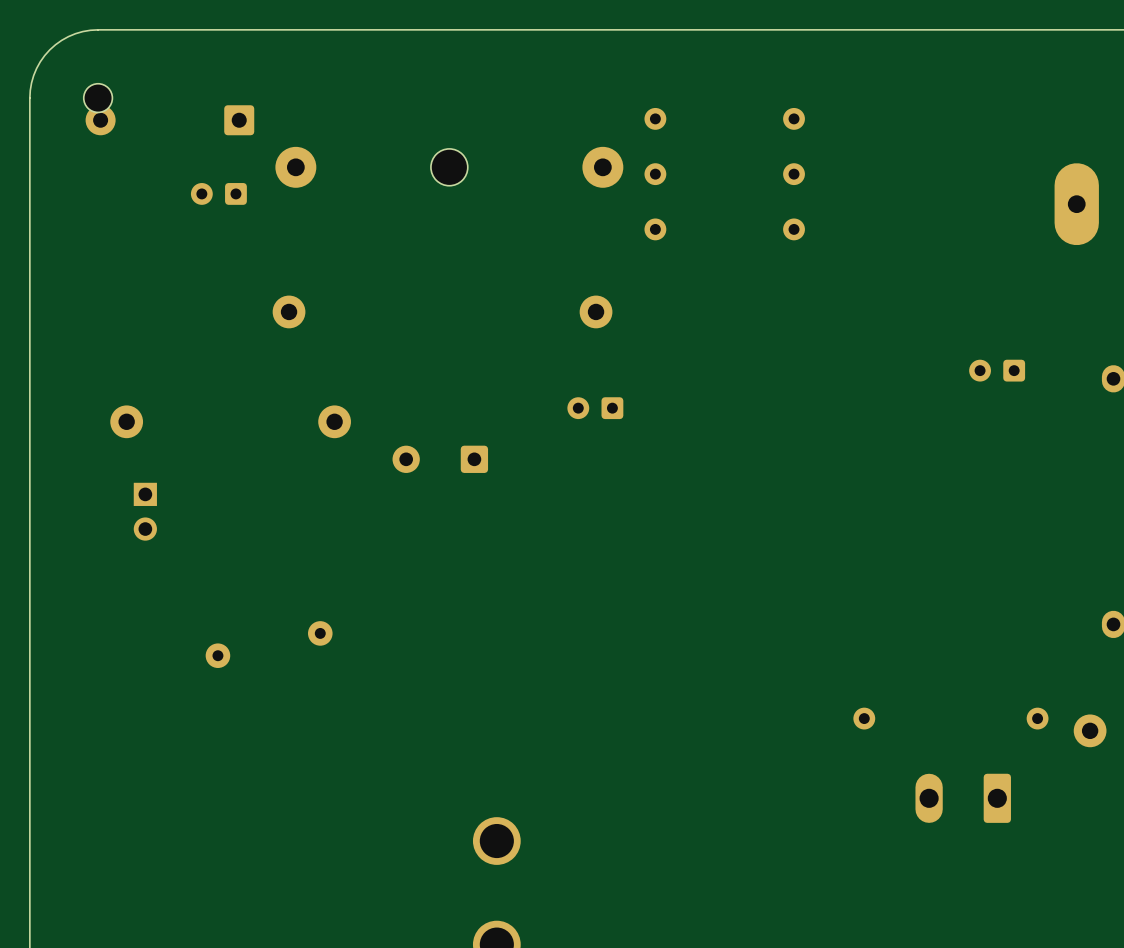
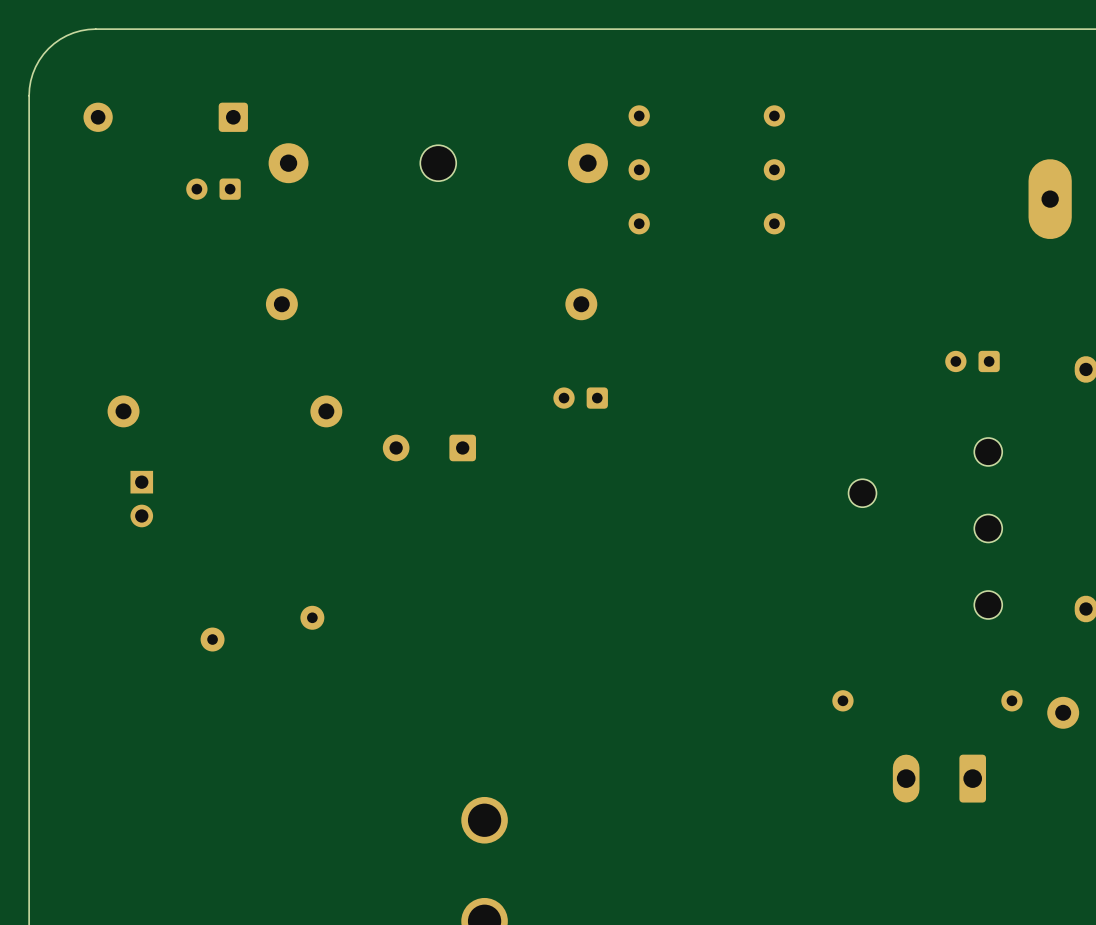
part: (98, 98) -> none
part: none -> (988, 451)
part: none -> (862, 493)
part: none -> (988, 528)
part: none -> (988, 605)

